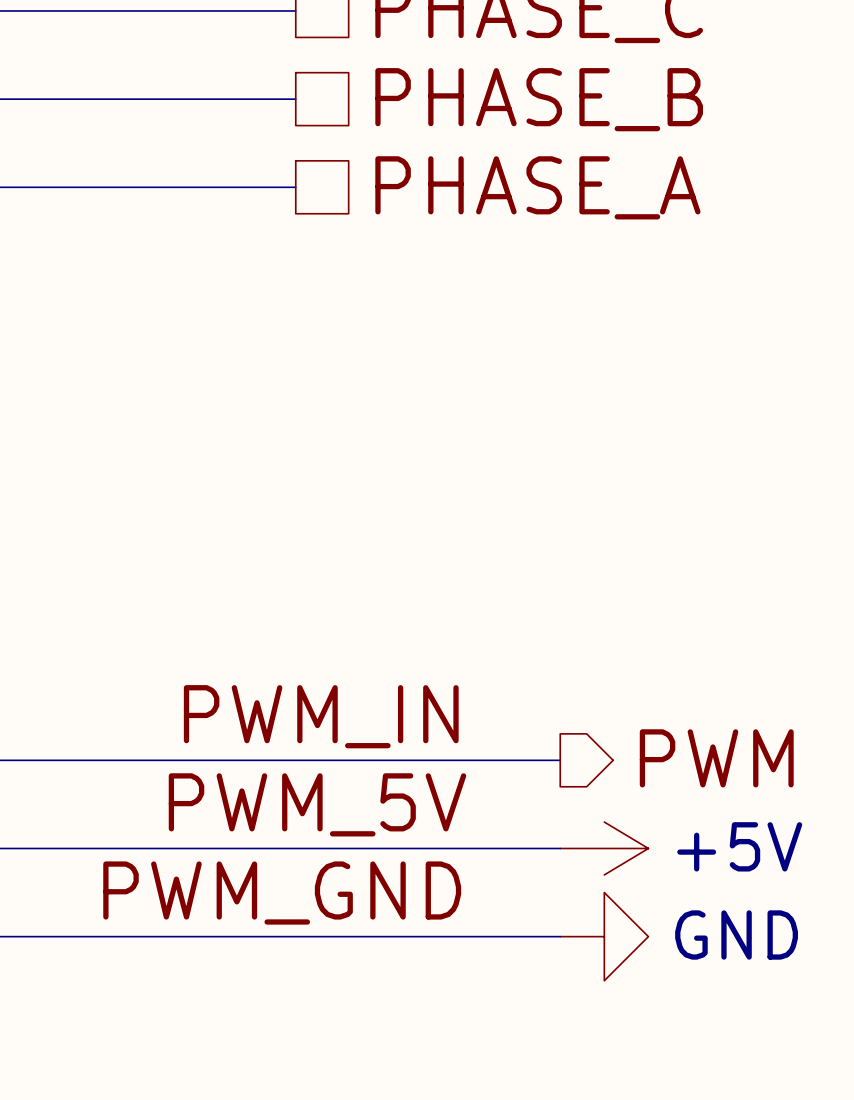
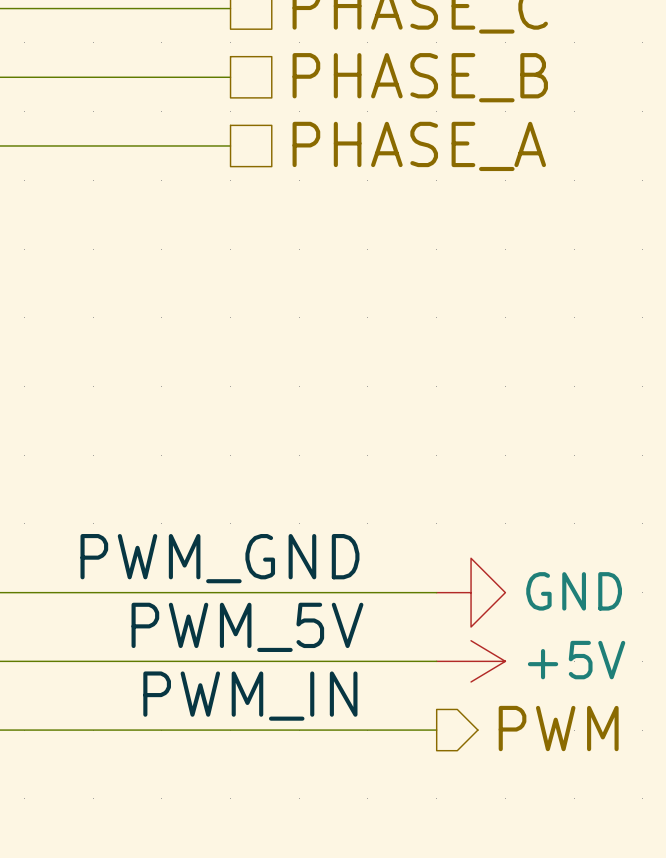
label: PWM_IN (321, 716) -> PWM_GND (219, 558)
hierarchical label position: PWM (716, 758) -> PWM (558, 728)
label: PWM_GND (282, 893) -> PWM_IN (250, 696)
power symbol position: GND (604, 936) -> GND (471, 592)

